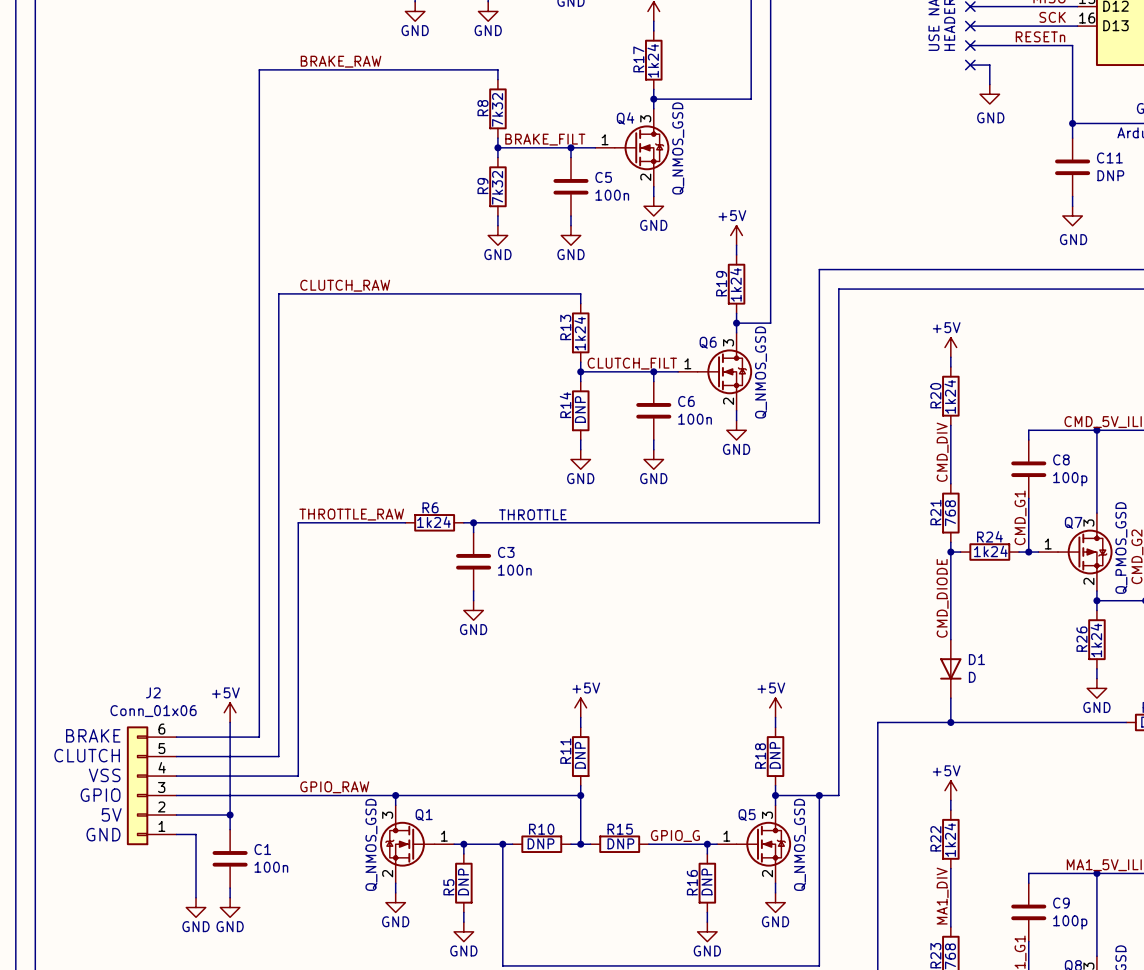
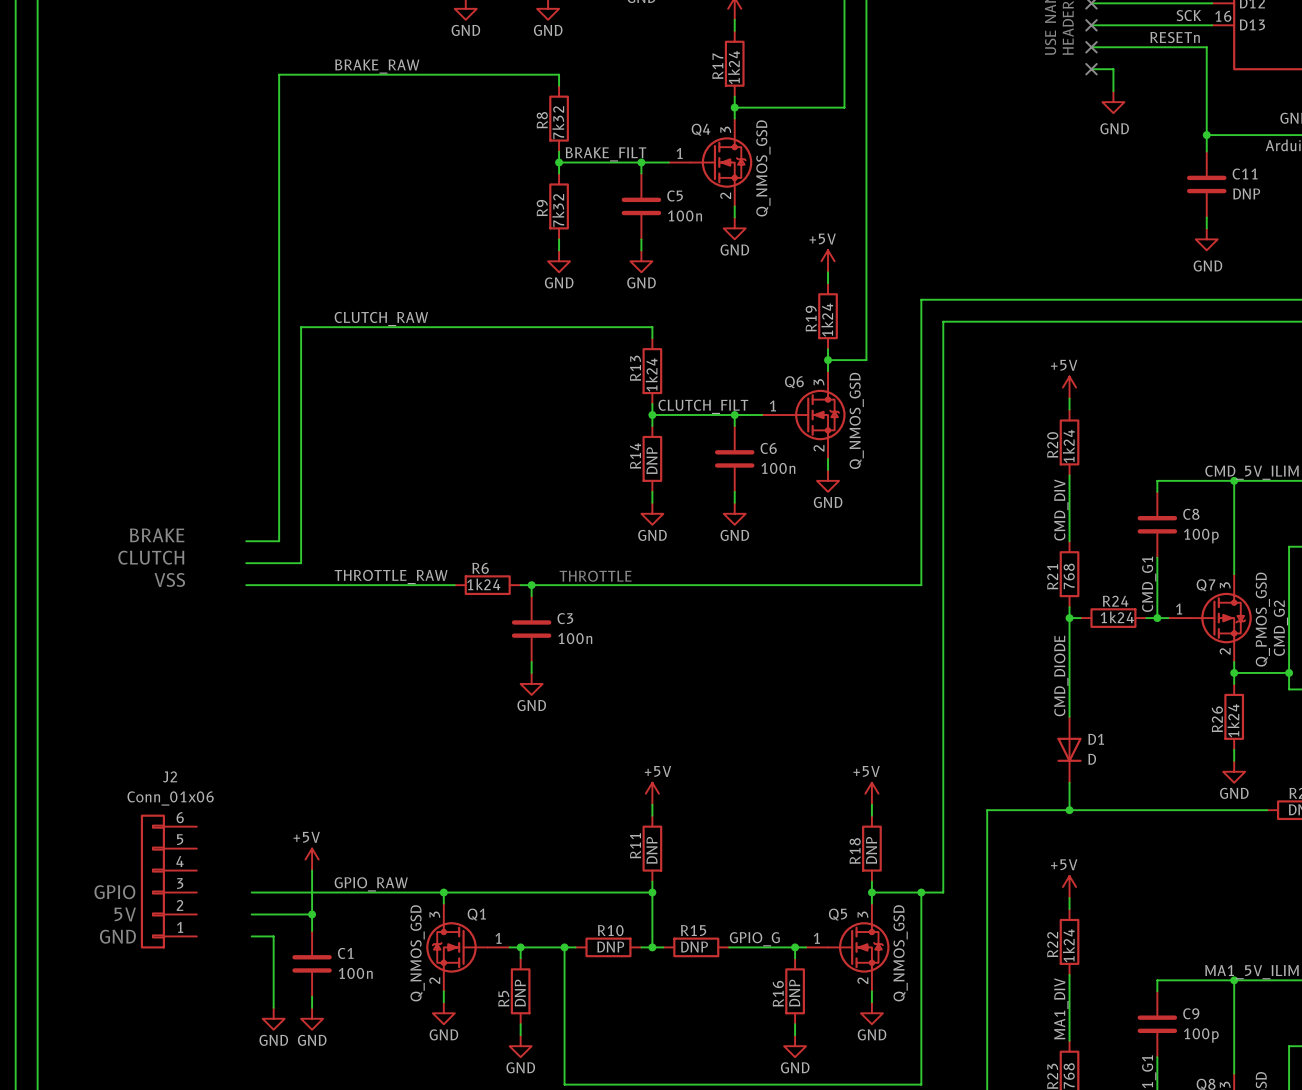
wire: (259, 69) (259, 737) (176, 737) -> (290, 74) (279, 74) (279, 541) (246, 541)
wire: (278, 293) (278, 756) (176, 756) -> (312, 327) (301, 327) (301, 563) (246, 563)
text: none -> BRAKE (157, 535)
text: none -> CLUTCH (151, 557)
text: none -> VSS (169, 579)
wire: (298, 522) (298, 776) (176, 776) -> (334, 585) (246, 585)
power symbol position: +5V (230, 712) -> +5V (312, 859)
wire: (230, 722) (230, 829) -> none
text: BRAKE (93, 735) -> none
text: CLUTCH (87, 755) -> none
text: VSS (104, 775) -> none
wire: none -> (312, 870) (312, 930)
wire: (176, 795) (225, 795) -> none
wire: (176, 815) (225, 815) -> (257, 914) (312, 914)
junction: (230, 815) -> none
junction: none -> (312, 914)
wire: (176, 834) (196, 834) (196, 897) -> (251, 936) (273, 936) (273, 1007)
C1 position: (230, 858) -> (312, 963)
wire: (230, 888) (230, 897) -> (312, 996) (312, 1007)
power symbol: GND (196, 907) -> none
power symbol position: GND (230, 907) -> GND (273, 1018)
power symbol: none -> GND (312, 1018)

